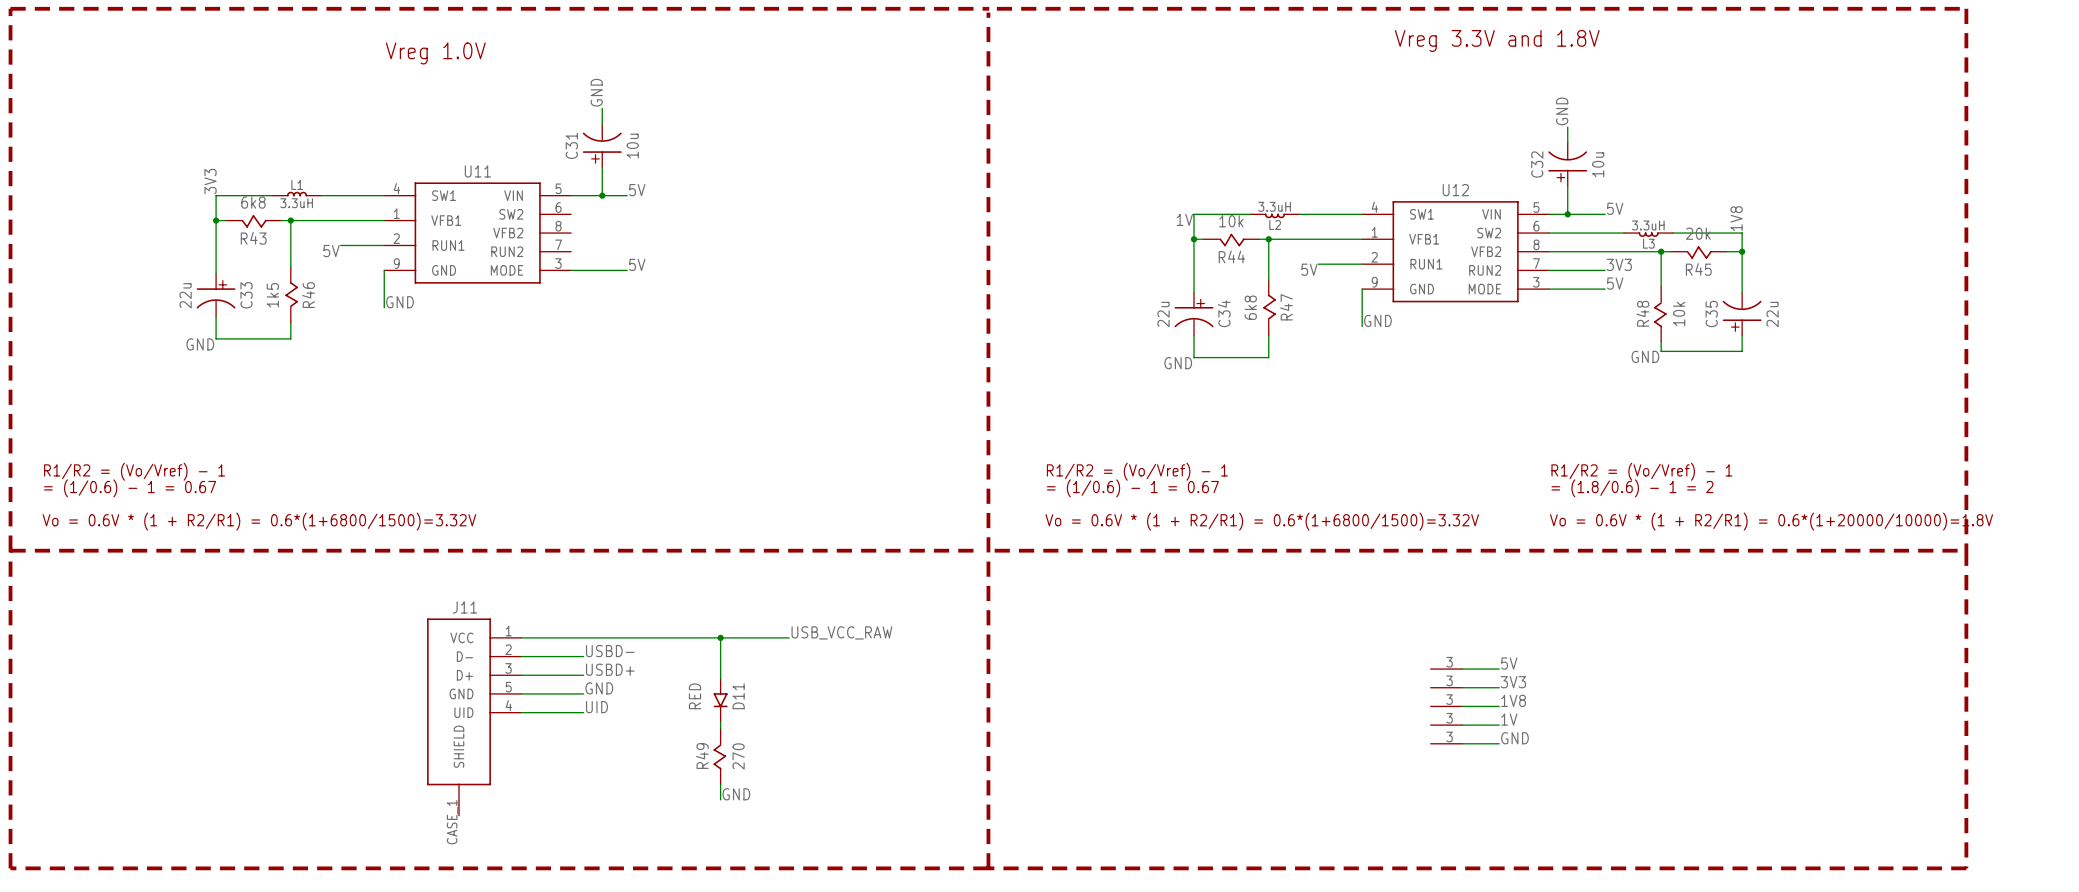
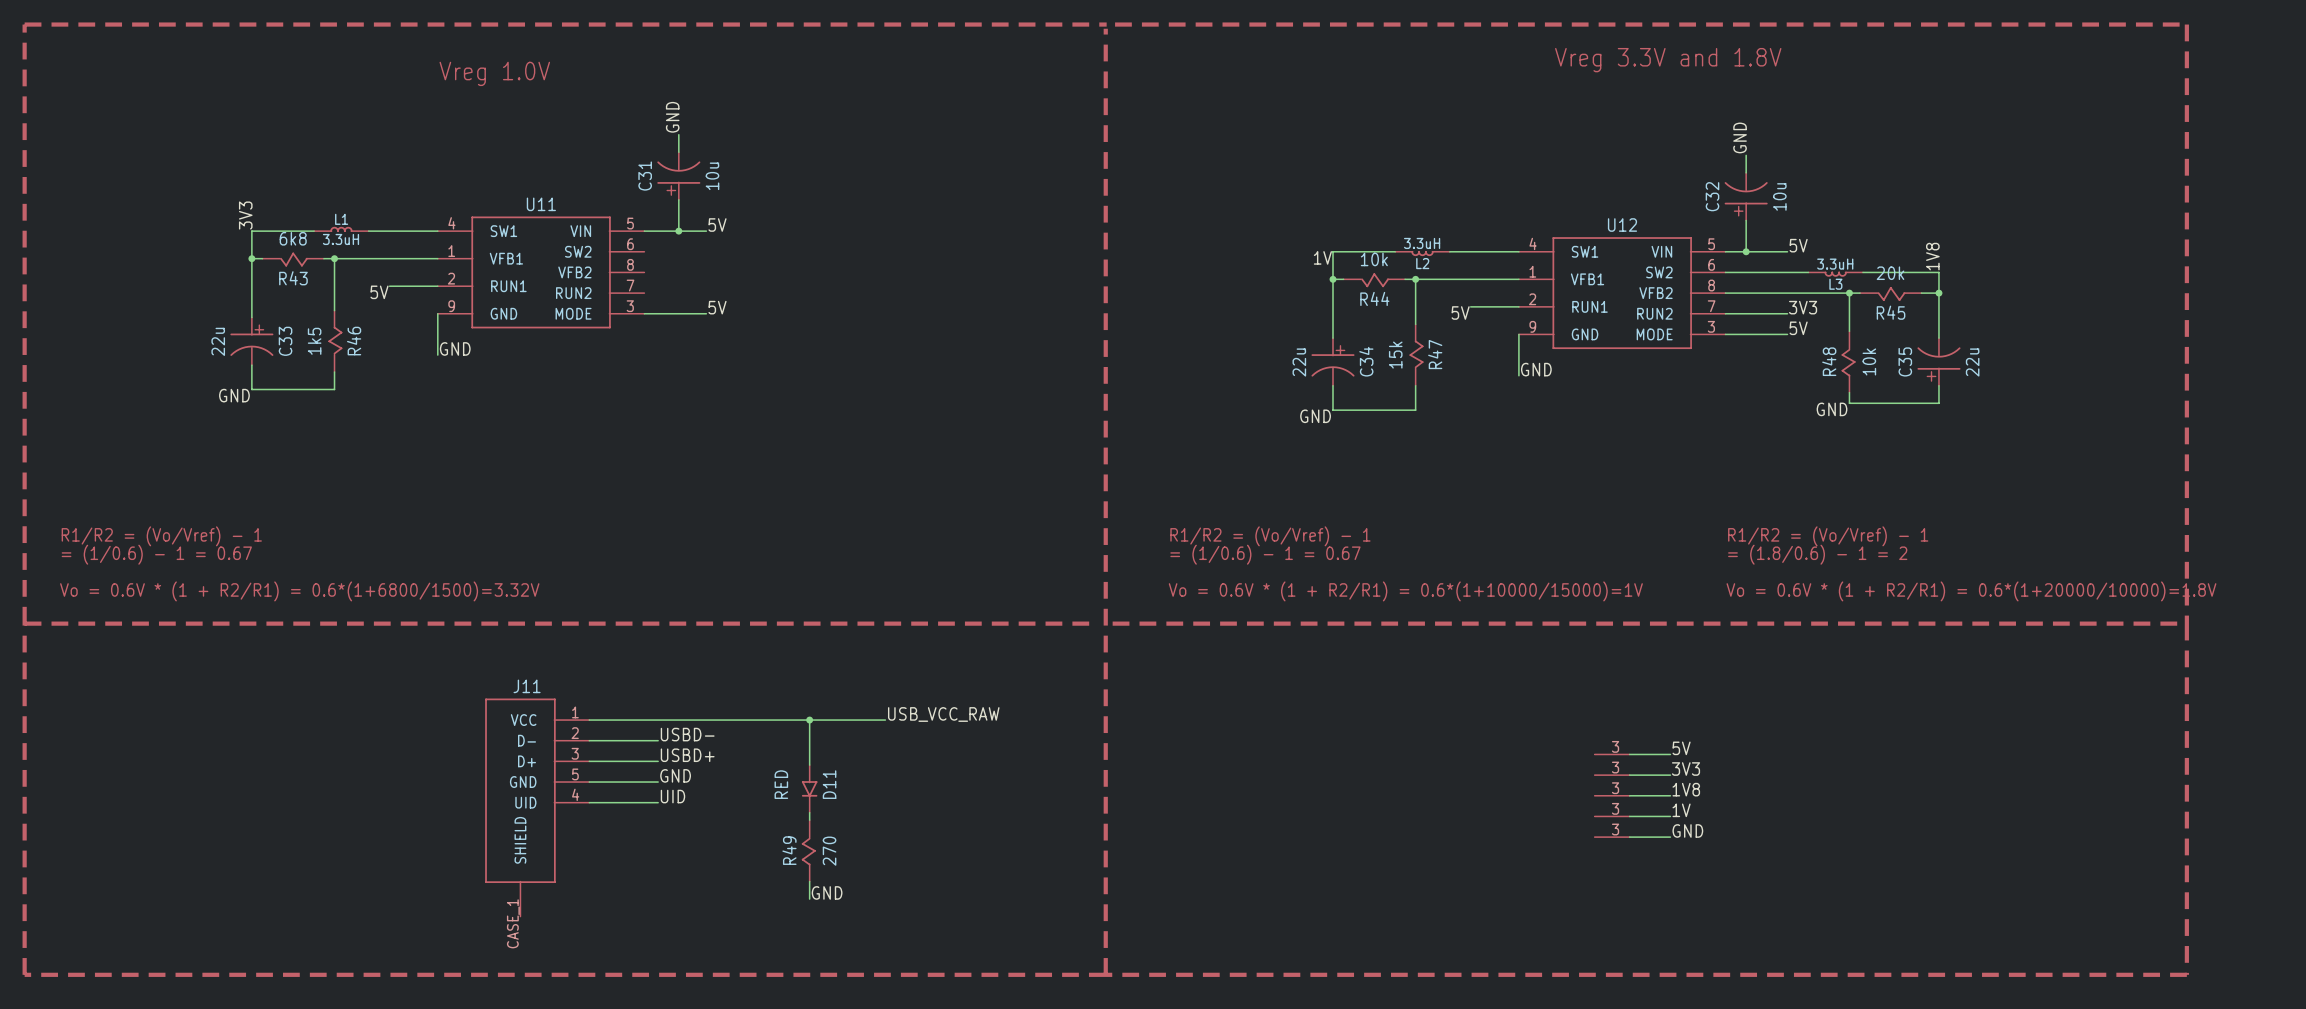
R47 value: 6k8 (1250, 307) -> 15k (1395, 355)
text: Vo = 0.6V * (1 + R2/R1) = 0.6*(1+6800/1500)=3.32V (1262, 521) -> Vo = 0.6V * (1 + R2/R1) = 0.6*(1+10000/15000)=1V (1405, 591)

